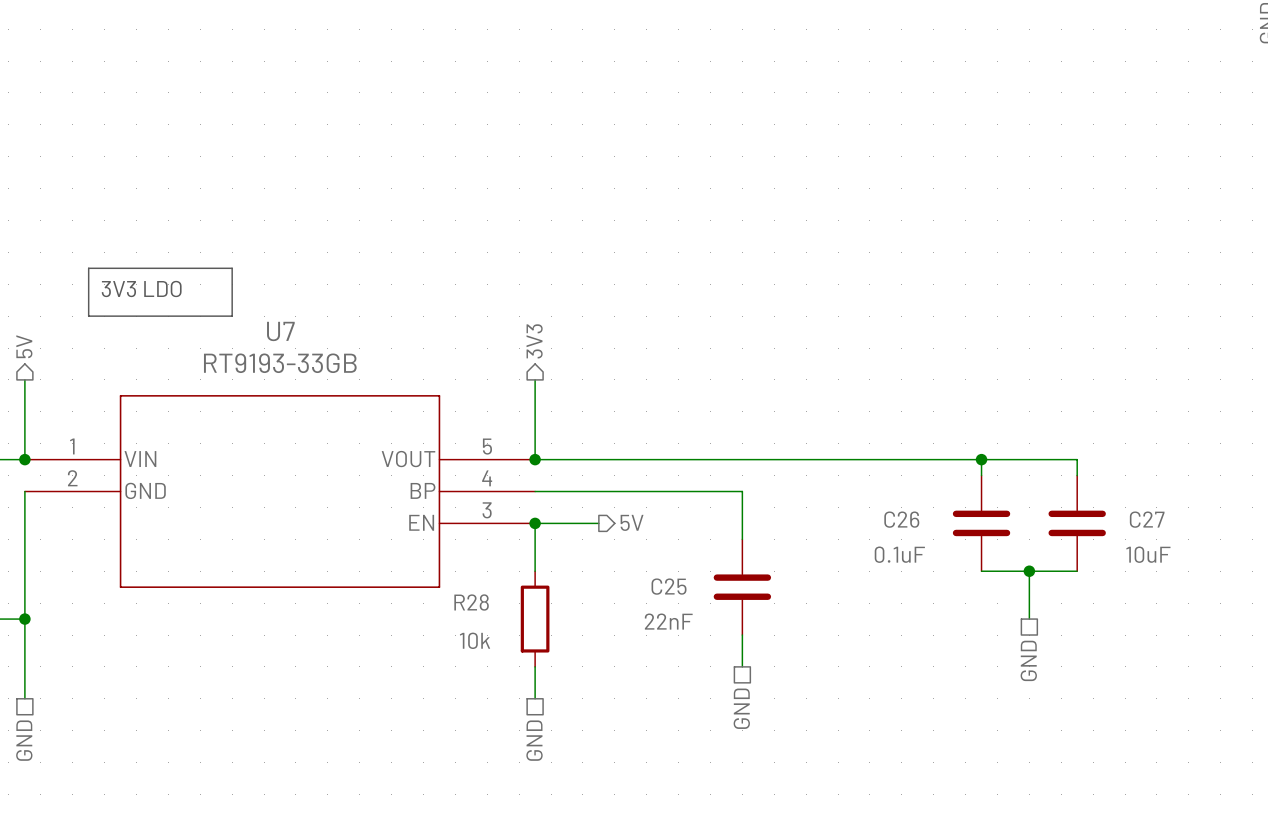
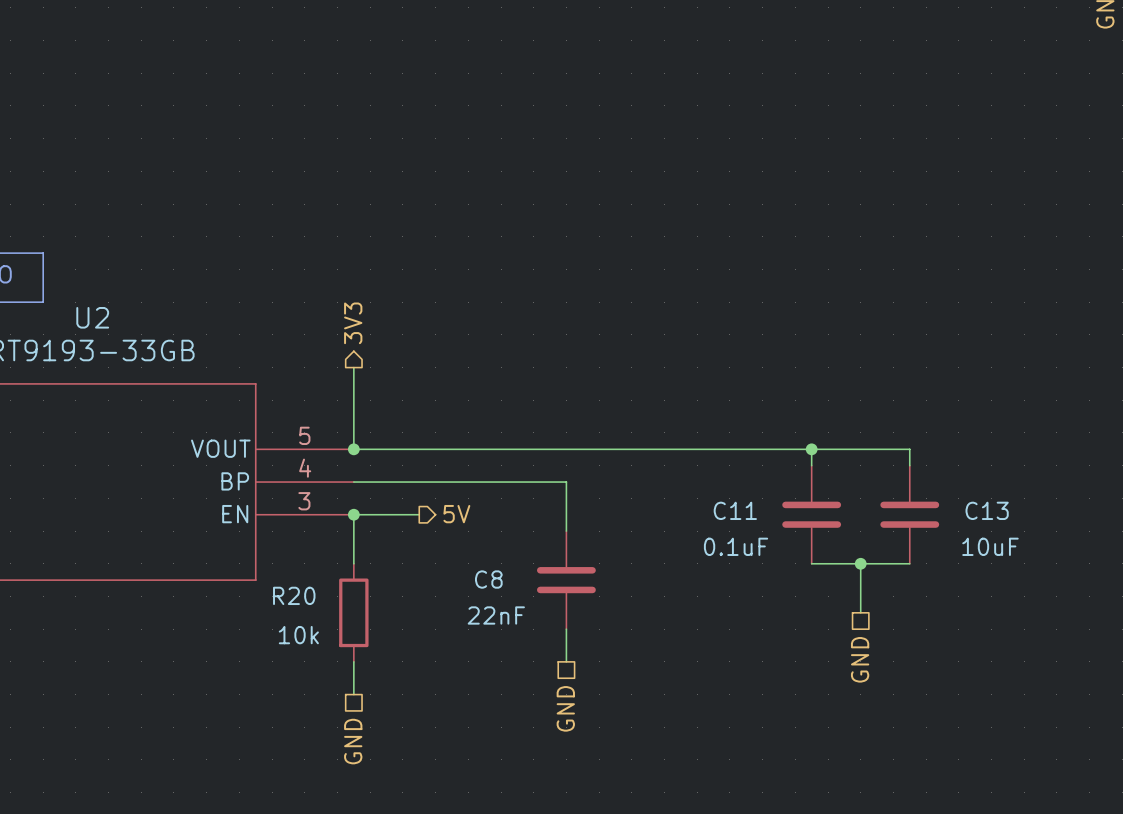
U7 name: U7 (280, 331) -> U2 (92, 317)
C26 name: C26 (901, 519) -> C11 (735, 510)
C27 name: C27 (1147, 519) -> C13 (987, 510)
C25 name: C25 (669, 586) -> C8 (488, 579)
R28 name: R28 (471, 602) -> R20 (294, 595)

